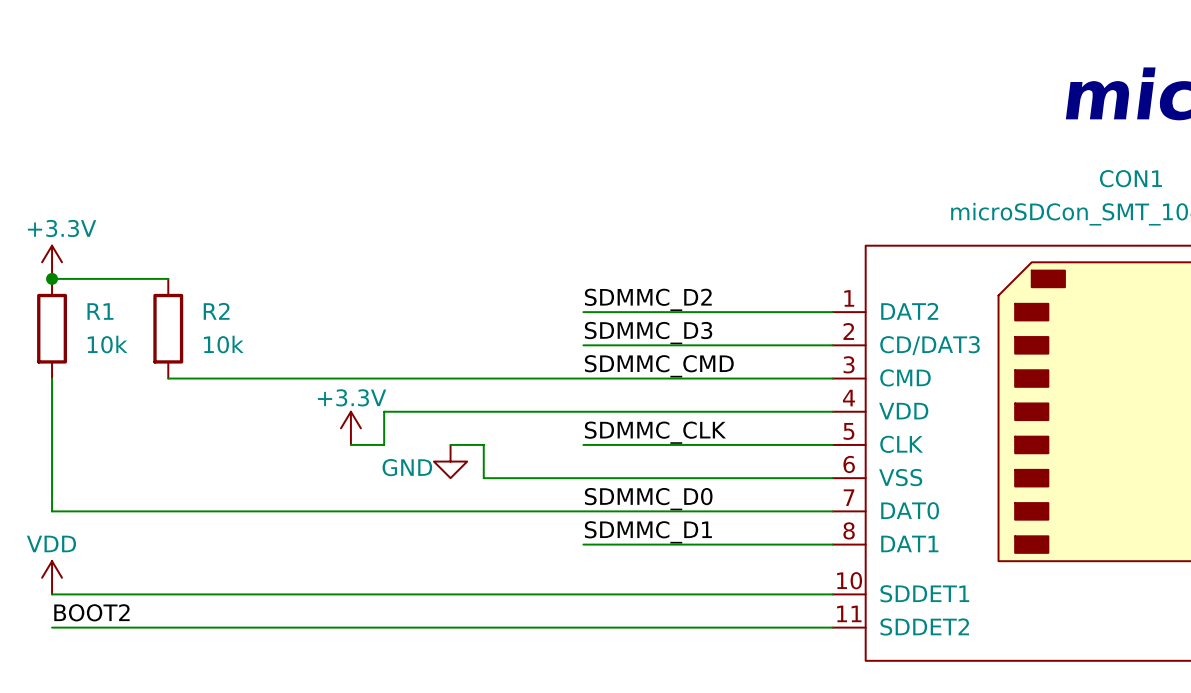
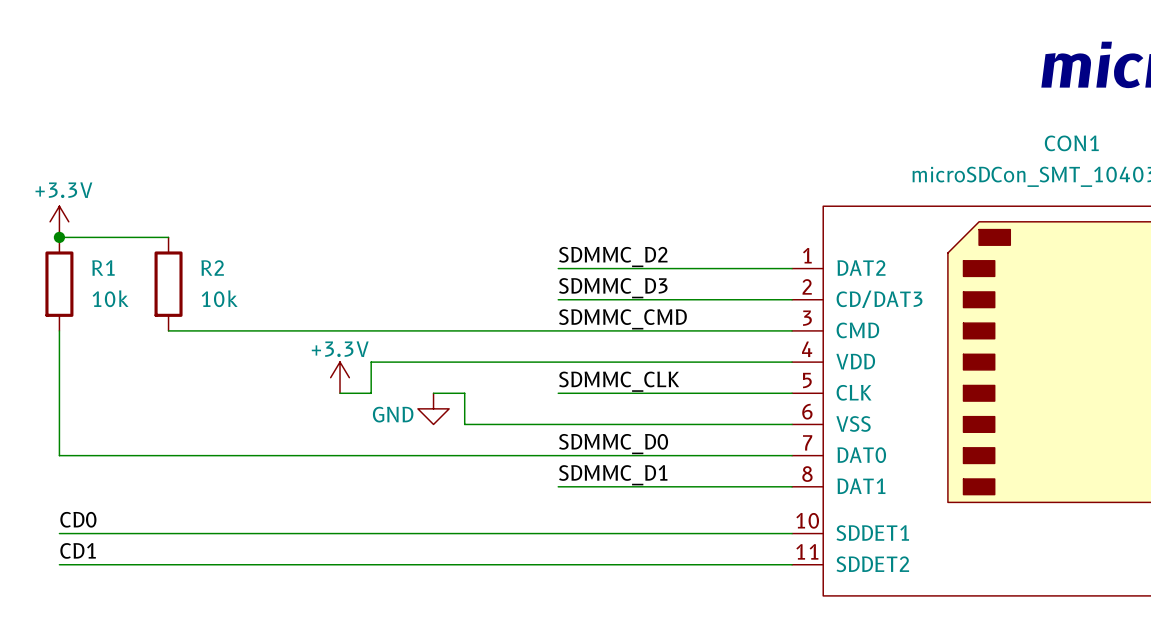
power symbol: VDD (52, 577) -> none
label: none -> CD0 (78, 519)
label: BOOT2 (91, 612) -> CD1 (78, 550)

